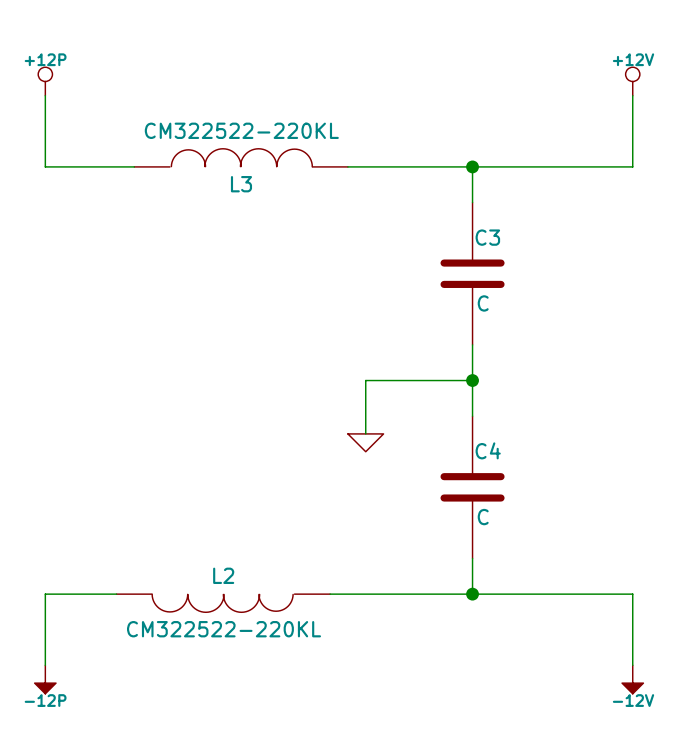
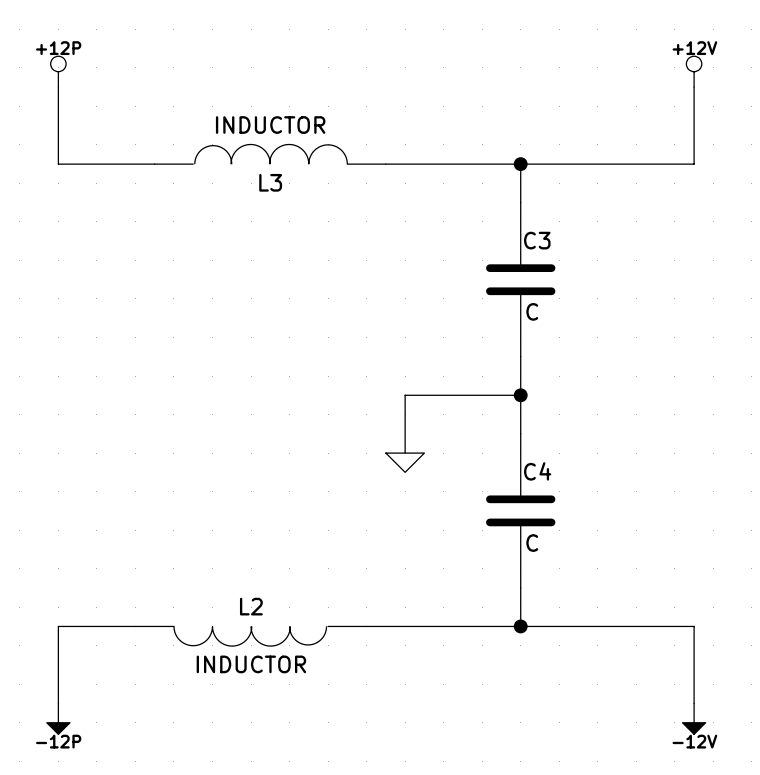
L3 value: CM322522-220KL (241, 130) -> INDUCTOR (270, 125)
L2 value: CM322522-220KL (224, 629) -> INDUCTOR (251, 664)

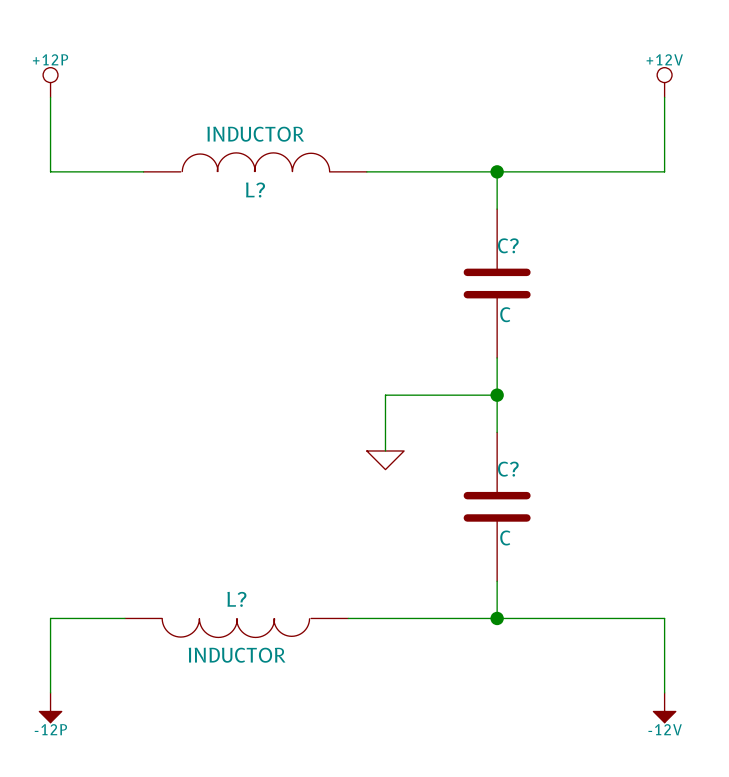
L3 name: L3 (270, 182) -> L? (255, 189)
C3 name: C3 (537, 240) -> C? (508, 245)
C4 name: C4 (537, 471) -> C? (508, 469)
L2 name: L2 (251, 606) -> L? (236, 599)

